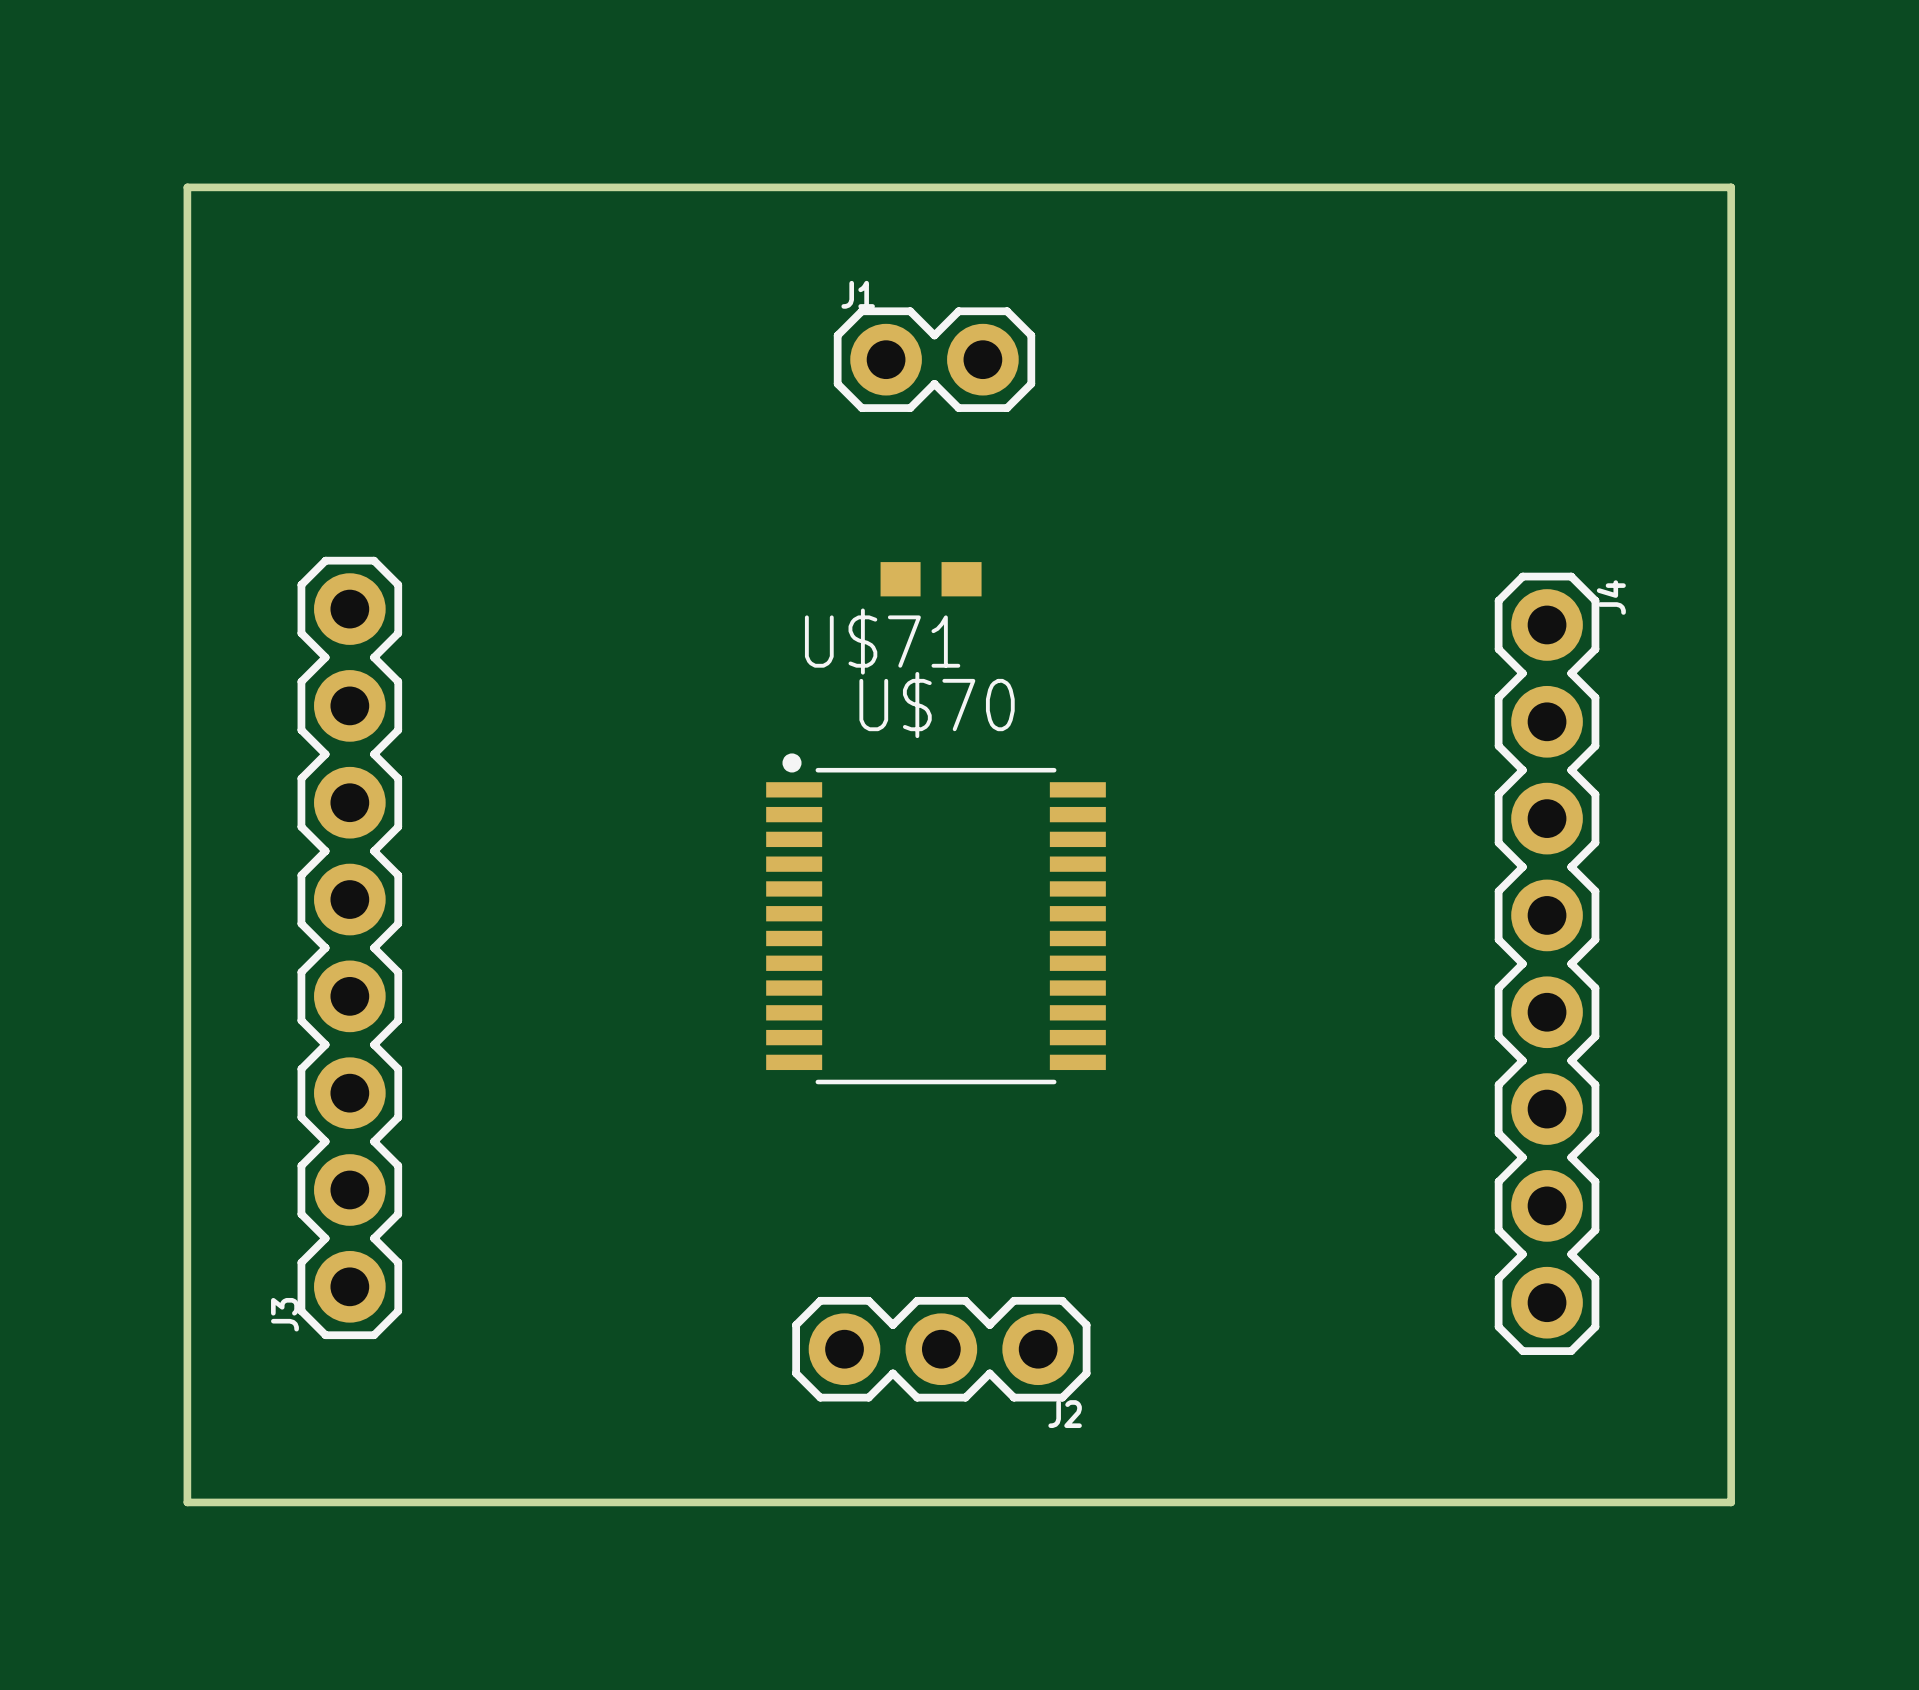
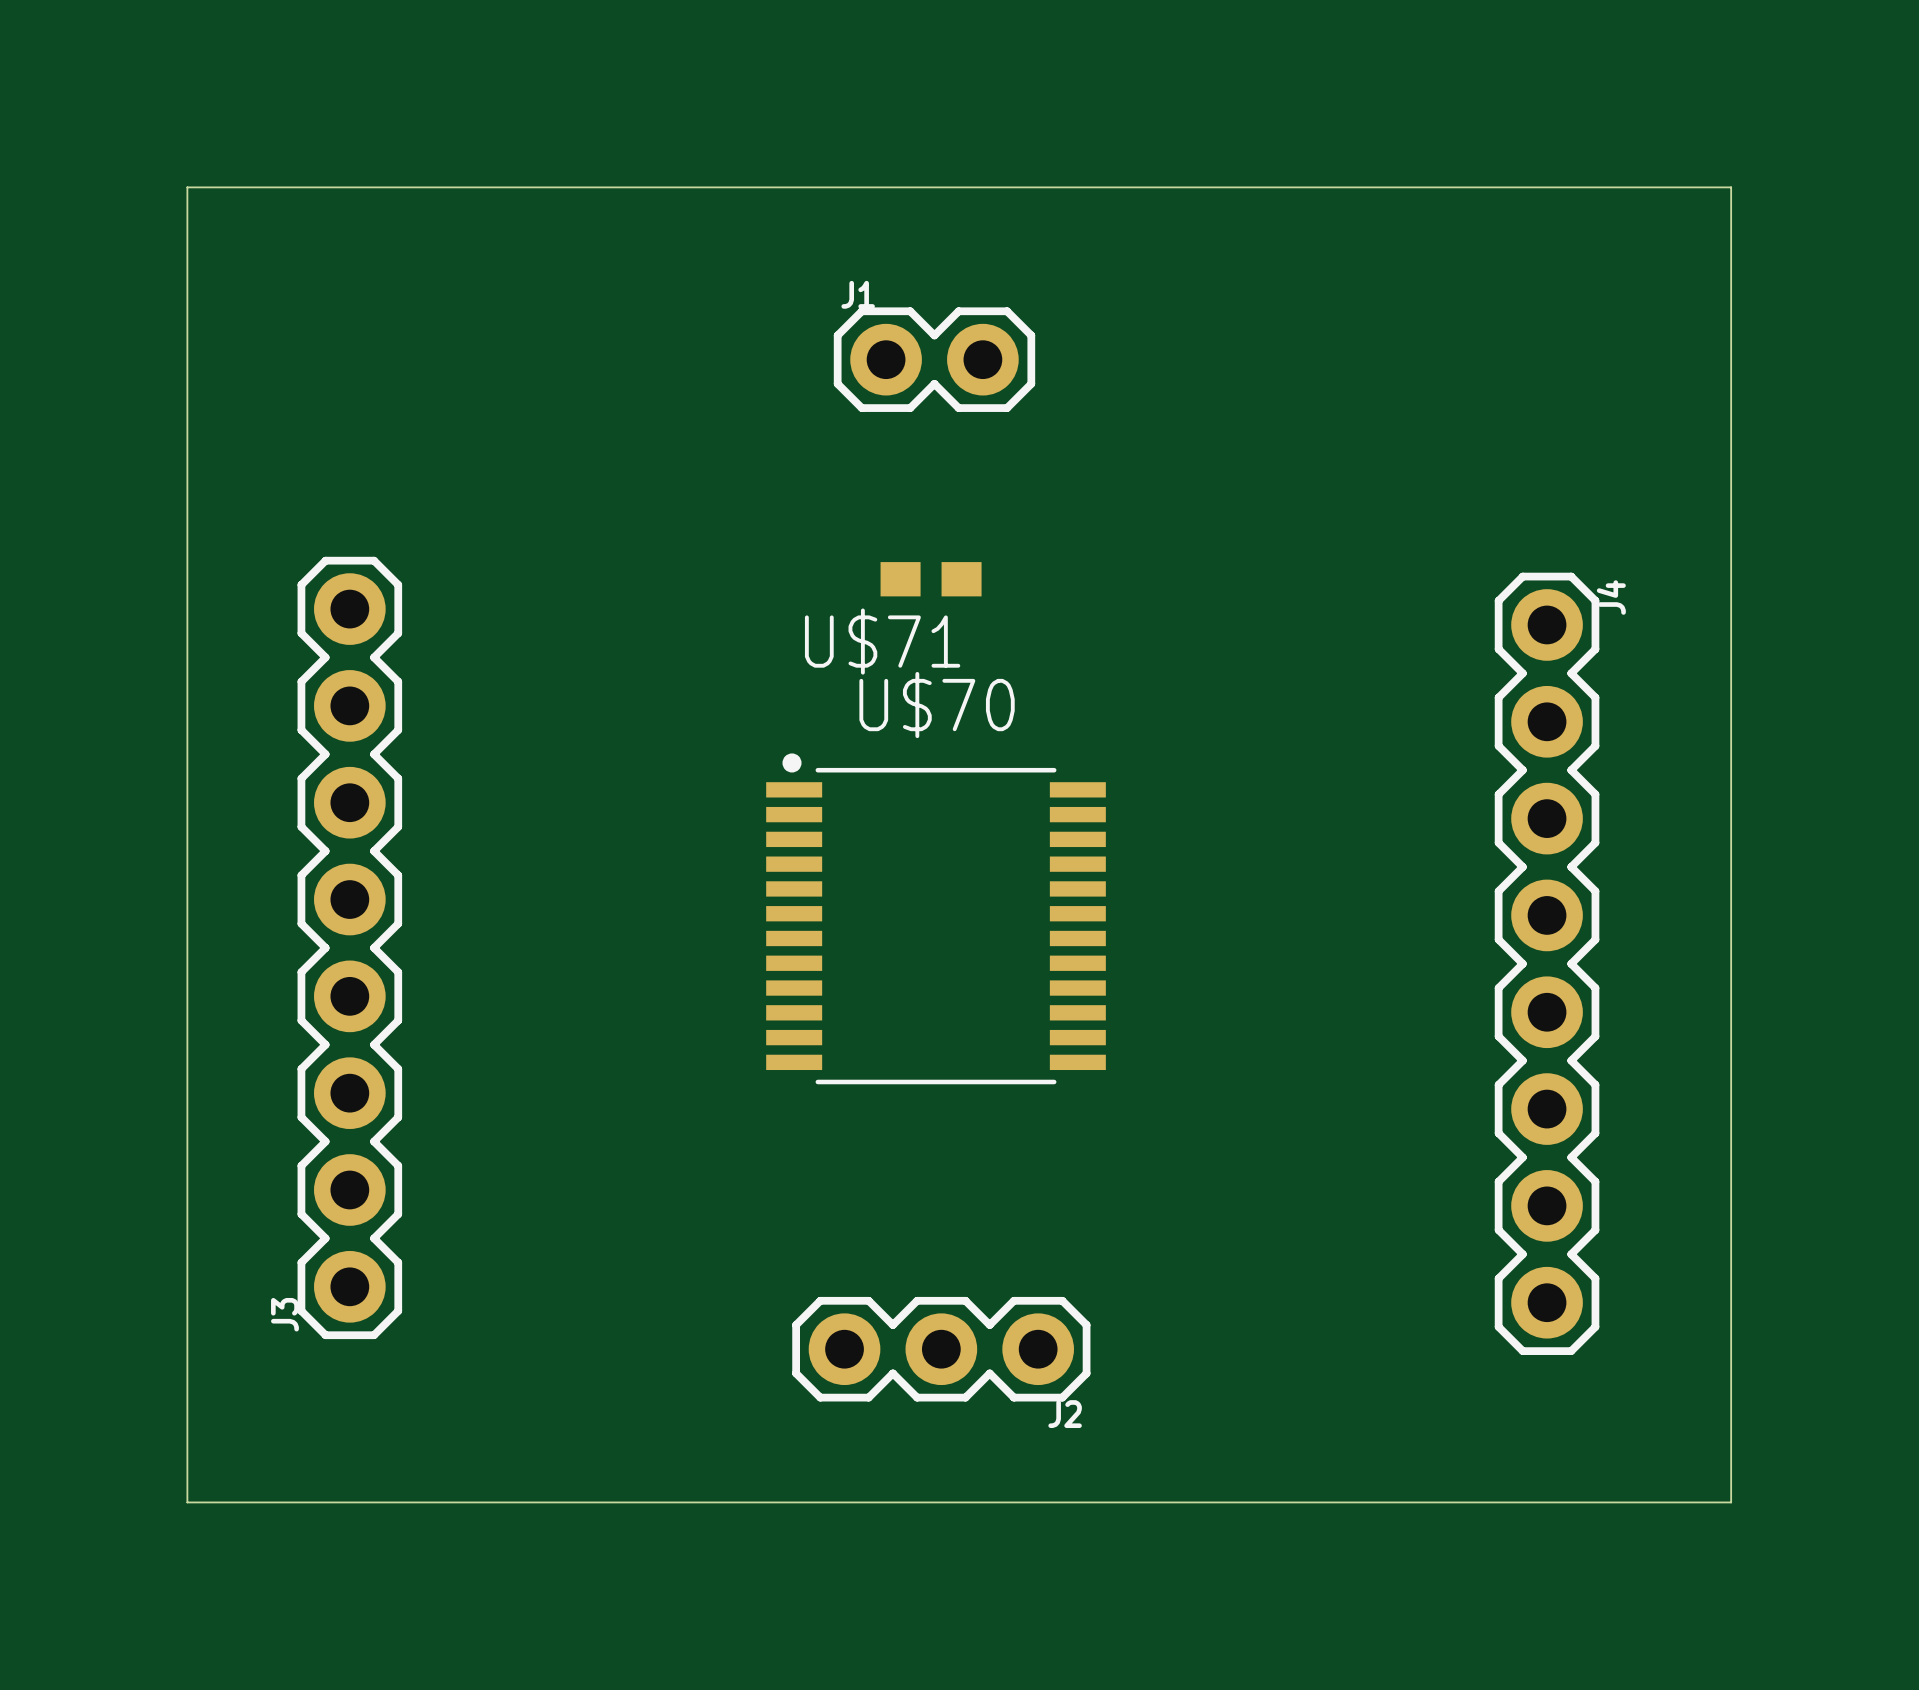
board edge width: thick (187, 187) (1731, 187) (1731, 1502) (187, 1502) (187, 187) -> thin (187, 187) (1731, 187) (1731, 1502) (187, 1502) (187, 187)

